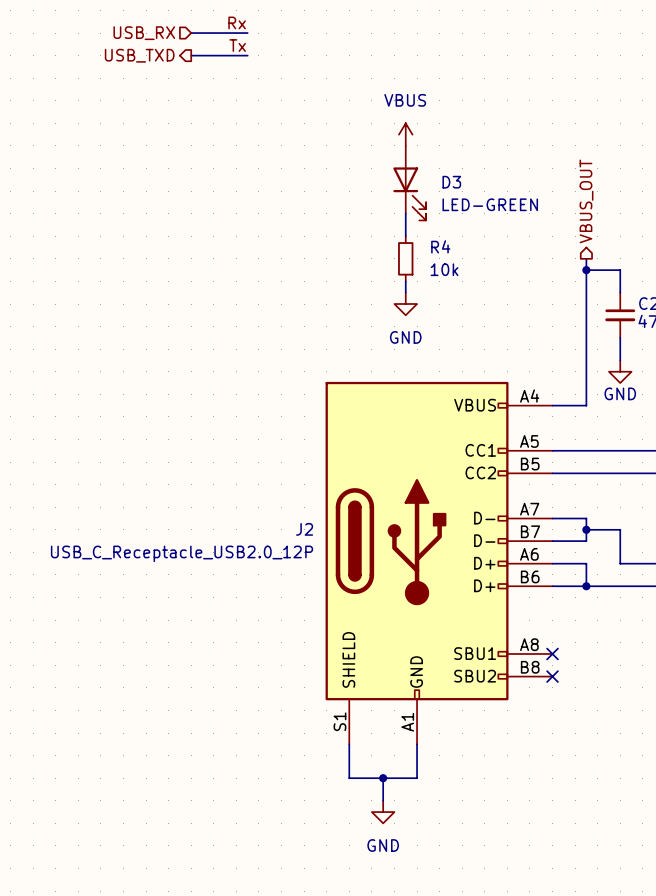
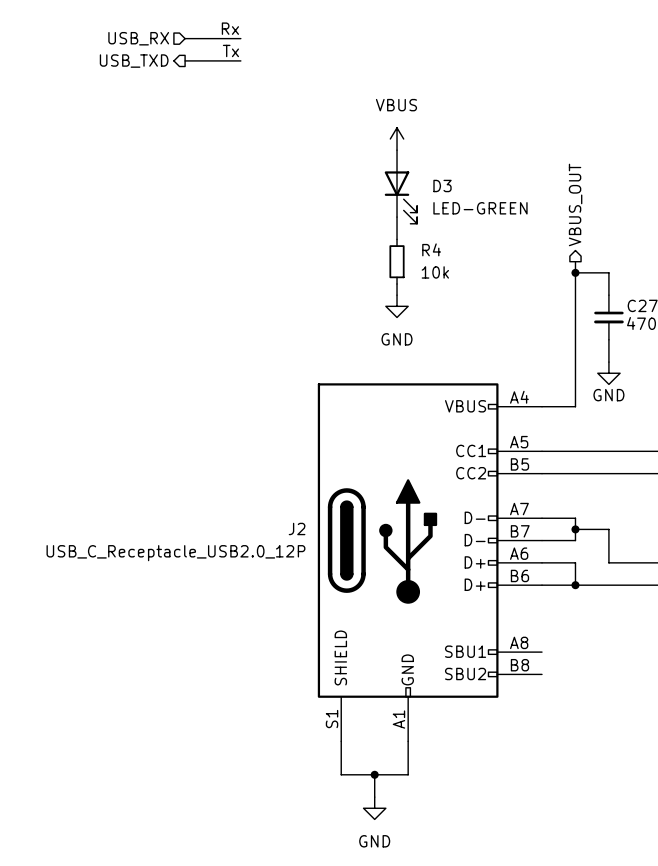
no-connect mark: (552, 654) -> none
no-connect mark: (552, 676) -> none

